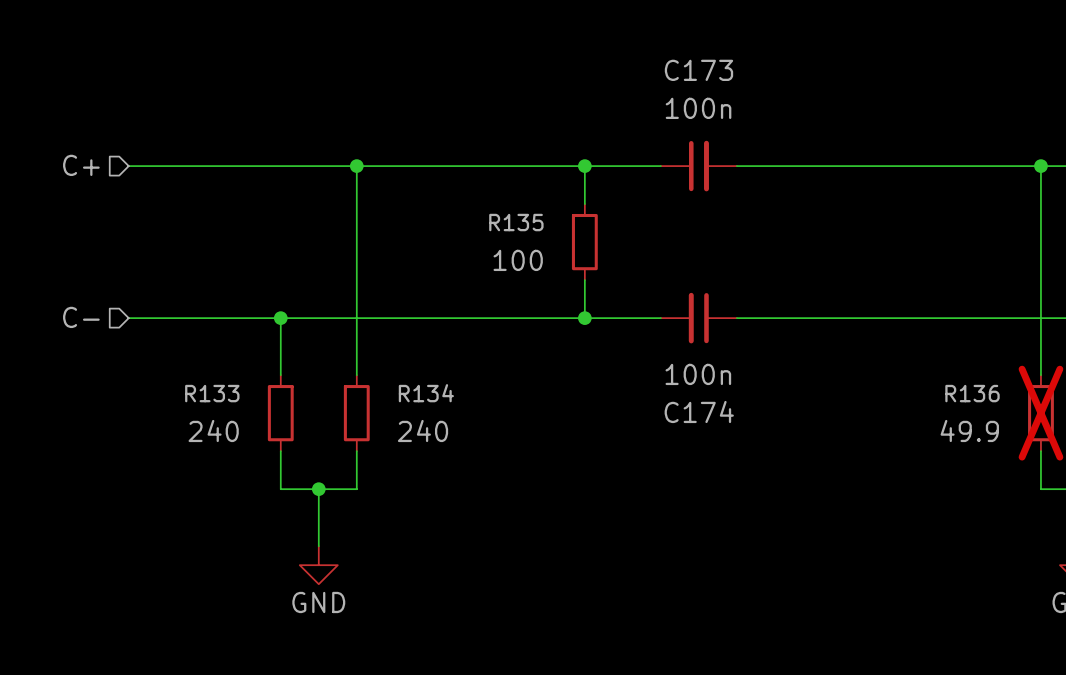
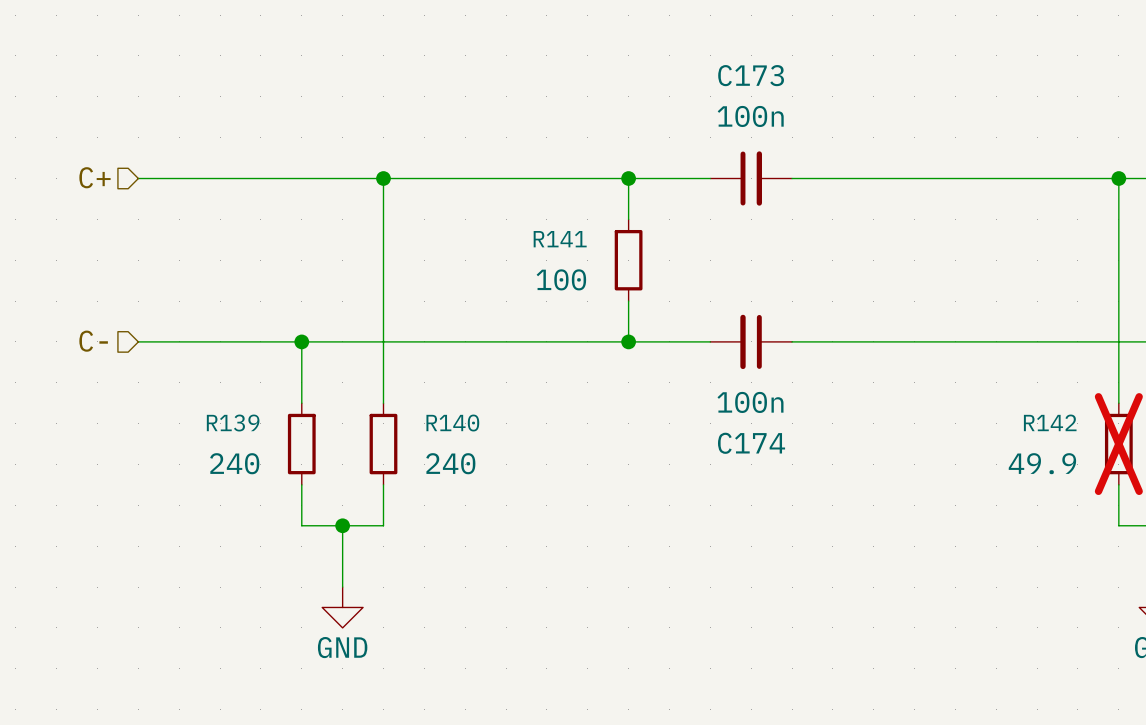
R135 name: R135 (516, 222) -> R141 (560, 239)
R133 name: R133 (212, 393) -> R139 (233, 423)
R134 name: R134 (426, 393) -> R140 (452, 423)
R136 name: R136 (972, 393) -> R142 (1050, 422)

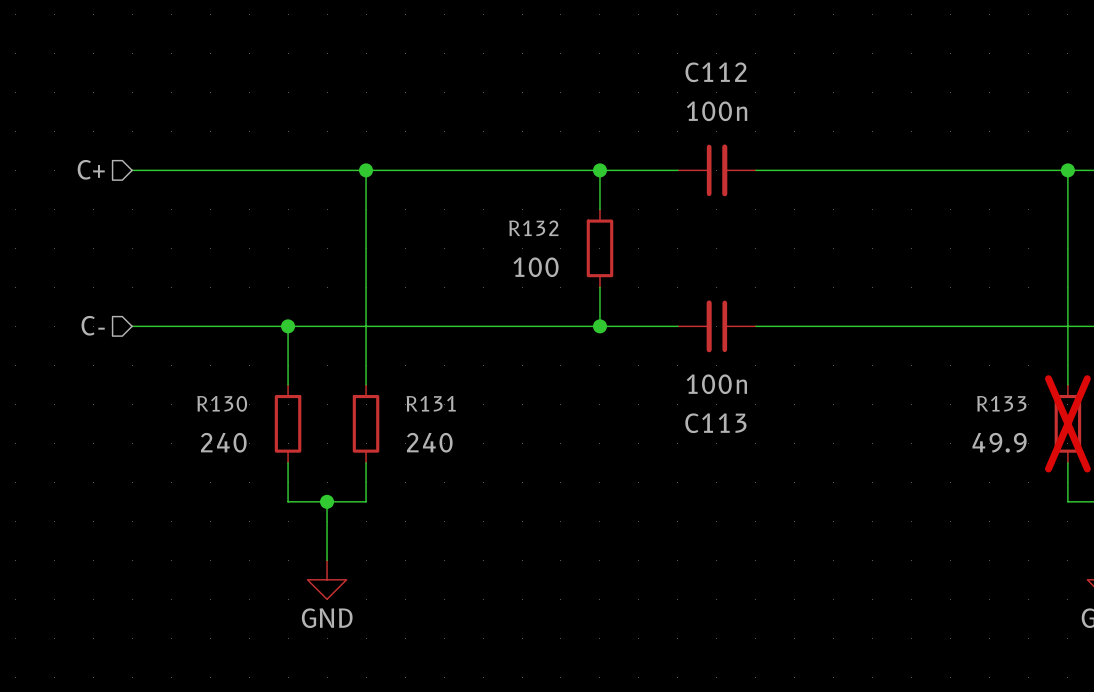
C173 name: C173 (751, 75) -> C112 (716, 72)
R141 name: R141 (560, 239) -> R132 (533, 228)
R142 name: R142 (1050, 422) -> R133 (1001, 403)
R139 name: R139 (233, 423) -> R130 (222, 403)
R140 name: R140 (452, 423) -> R131 (431, 403)
C174 name: C174 (751, 443) -> C113 (715, 423)

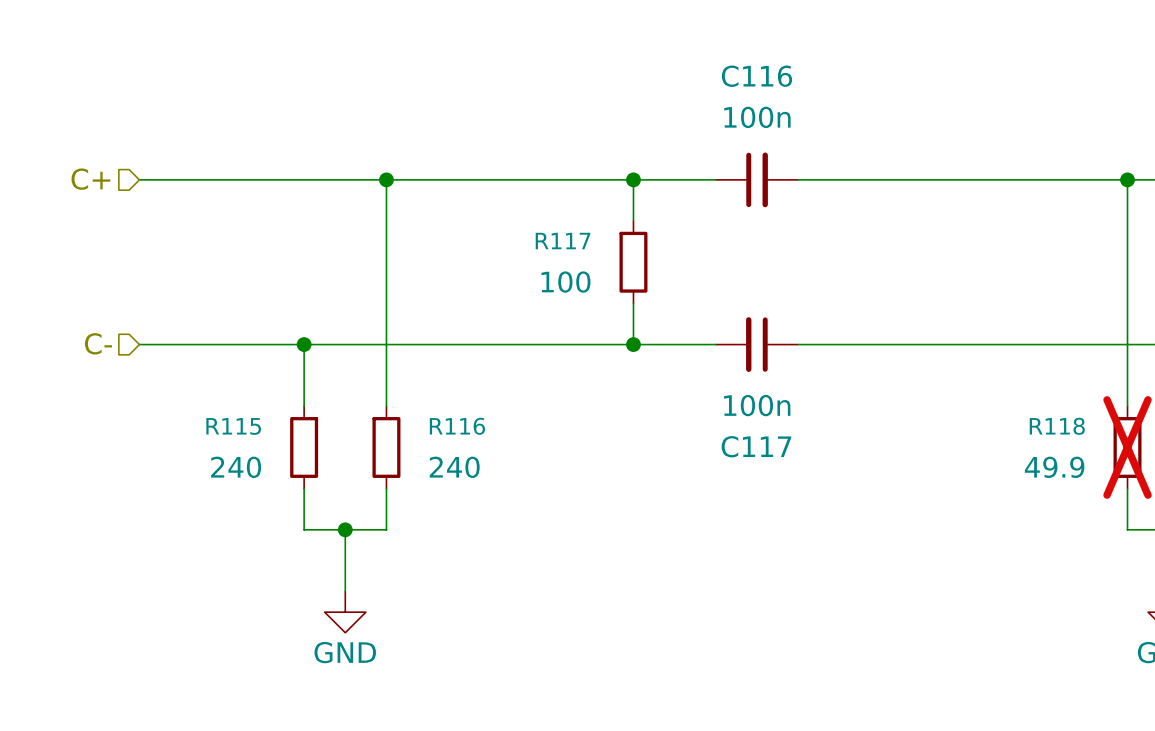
C112 name: C112 (716, 72) -> C116 (756, 76)
R132 name: R132 (533, 228) -> R117 (563, 241)
R130 name: R130 (222, 403) -> R115 (233, 426)
R131 name: R131 (431, 403) -> R116 (457, 426)
R133 name: R133 (1001, 403) -> R118 (1057, 426)
C113 name: C113 (715, 423) -> C117 (756, 446)

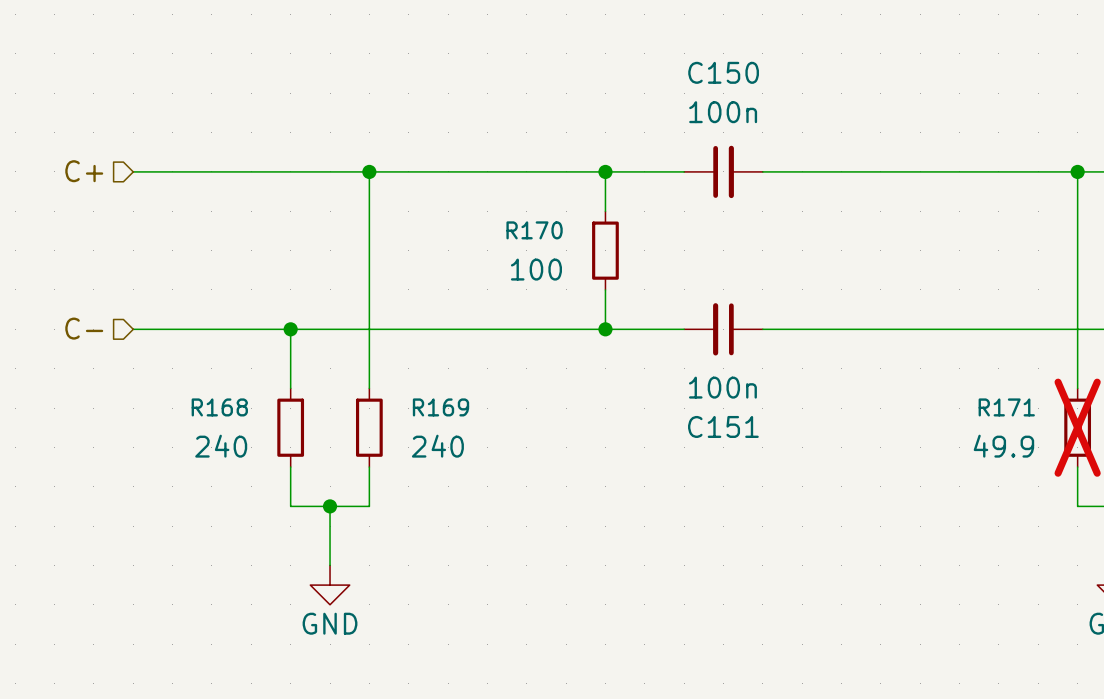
C116 name: C116 (756, 76) -> C150 (723, 72)
R117 name: R117 (563, 241) -> R170 (534, 230)
R115 name: R115 (233, 426) -> R168 (219, 407)
R116 name: R116 (457, 426) -> R169 (440, 407)
R118 name: R118 (1057, 426) -> R171 (1006, 407)
C117 name: C117 (756, 446) -> C151 (723, 426)

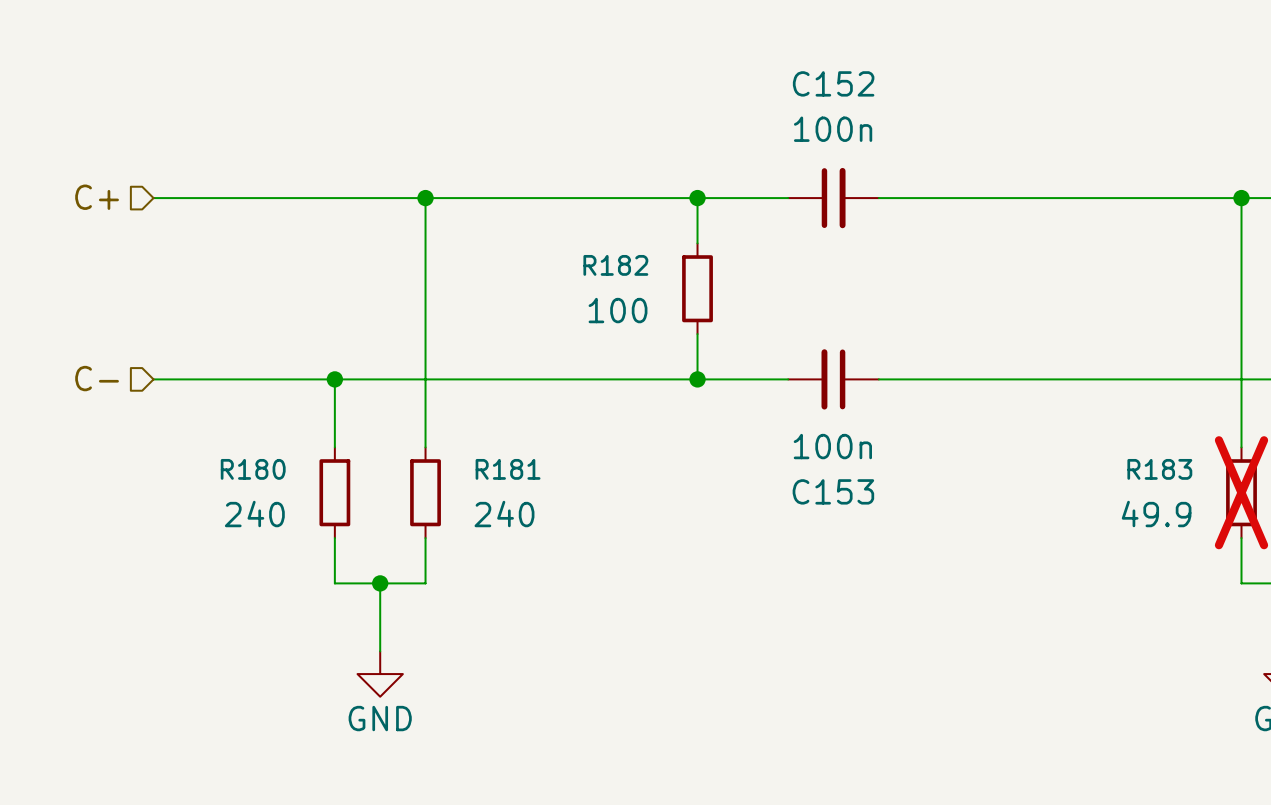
C150 name: C150 (723, 72) -> C152 (833, 83)
R170 name: R170 (534, 230) -> R182 (615, 265)
R168 name: R168 (219, 407) -> R180 (253, 469)
R169 name: R169 (440, 407) -> R181 (508, 469)
R171 name: R171 (1006, 407) -> R183 (1159, 469)
C151 name: C151 (723, 426) -> C153 (833, 491)

